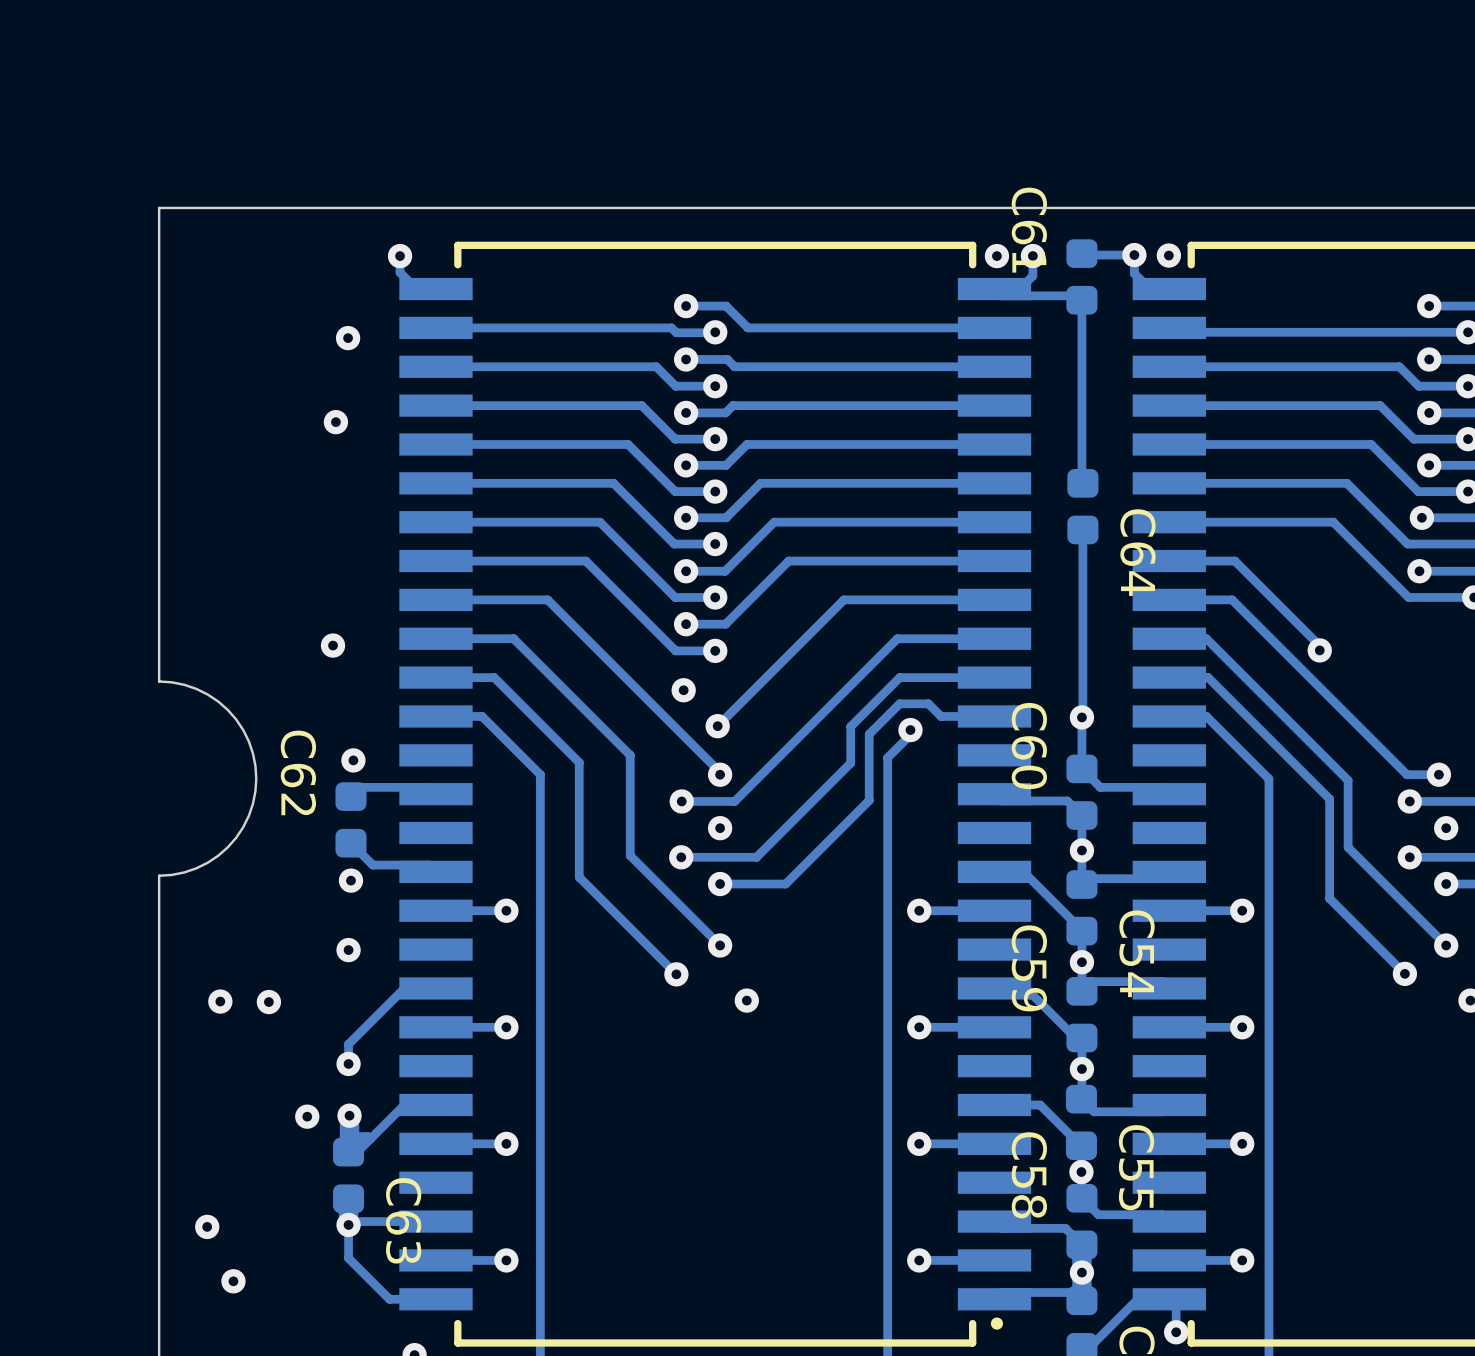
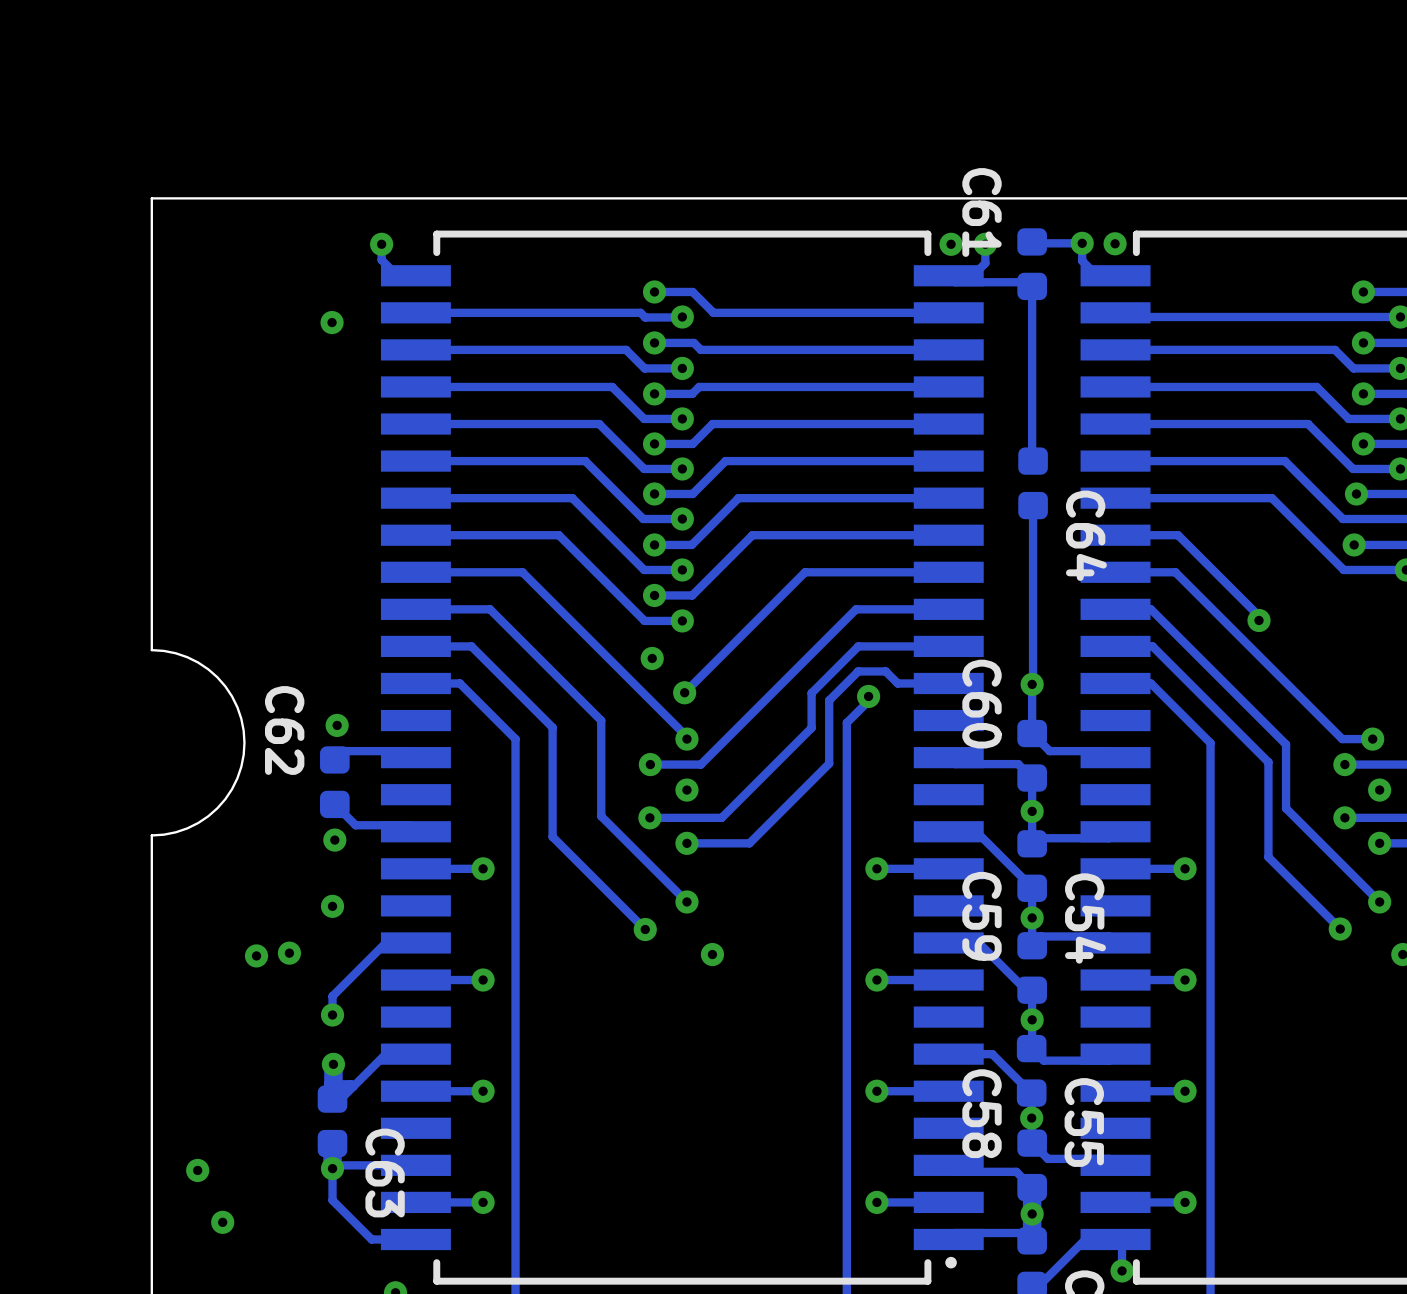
via: (335, 422) -> none
via: (333, 645) -> none
via: none -> (289, 953)
via: (220, 1001) -> none
via: (307, 1116) -> none

